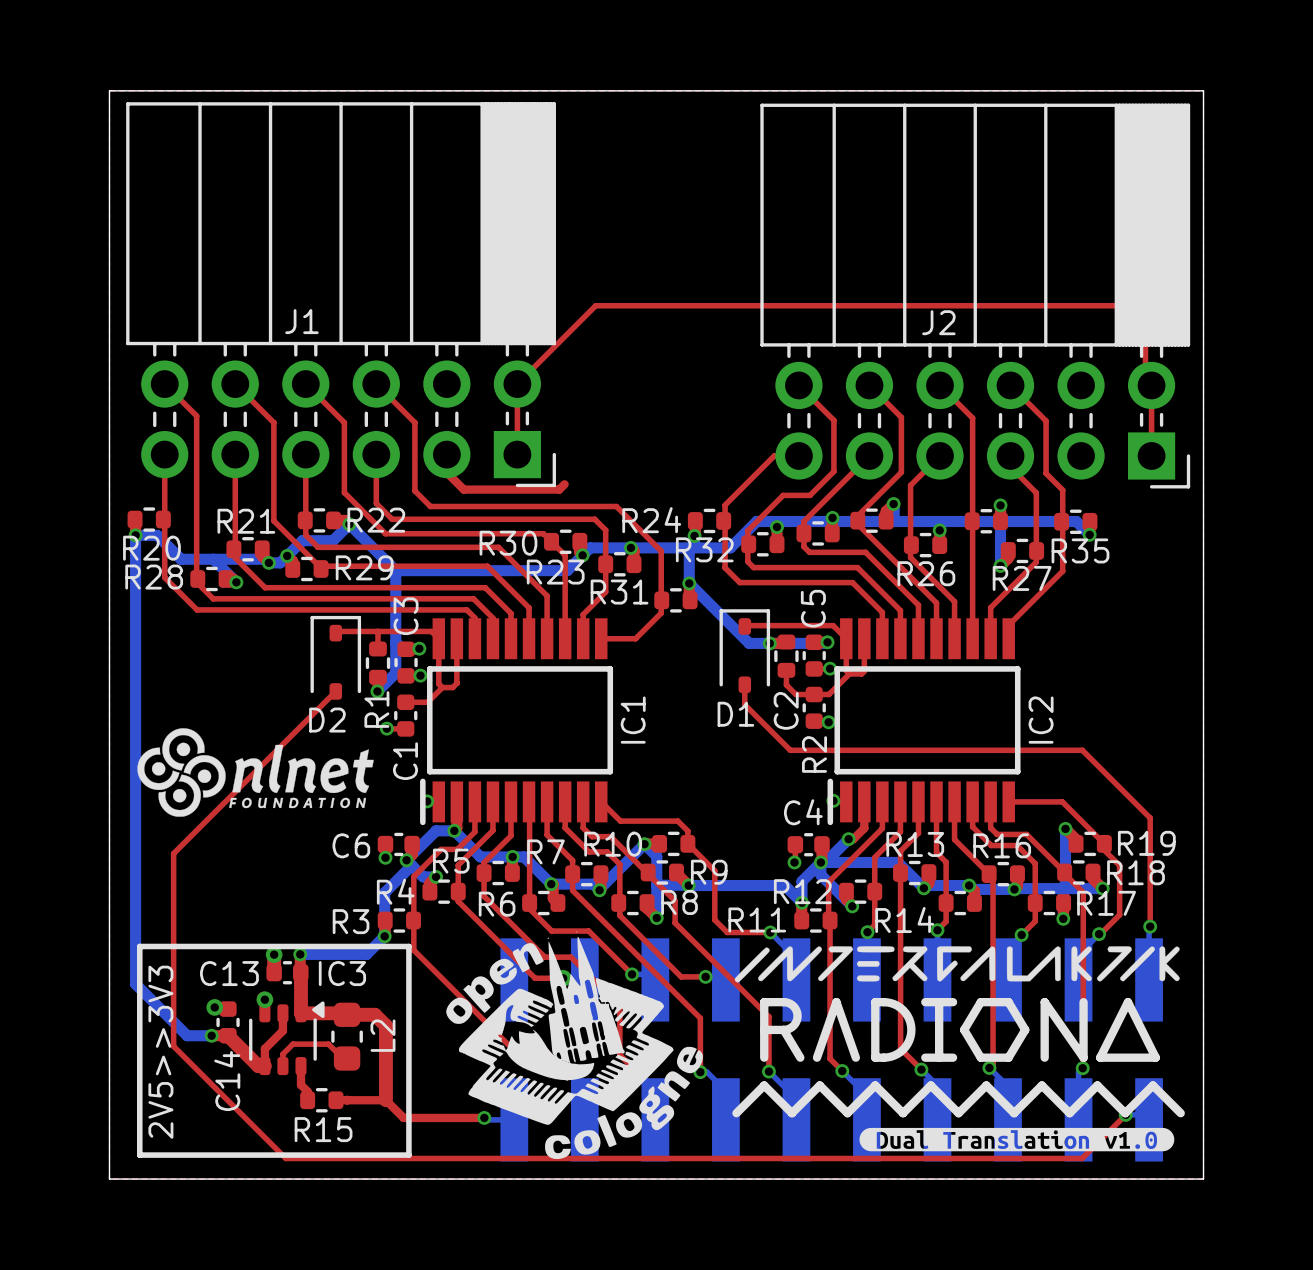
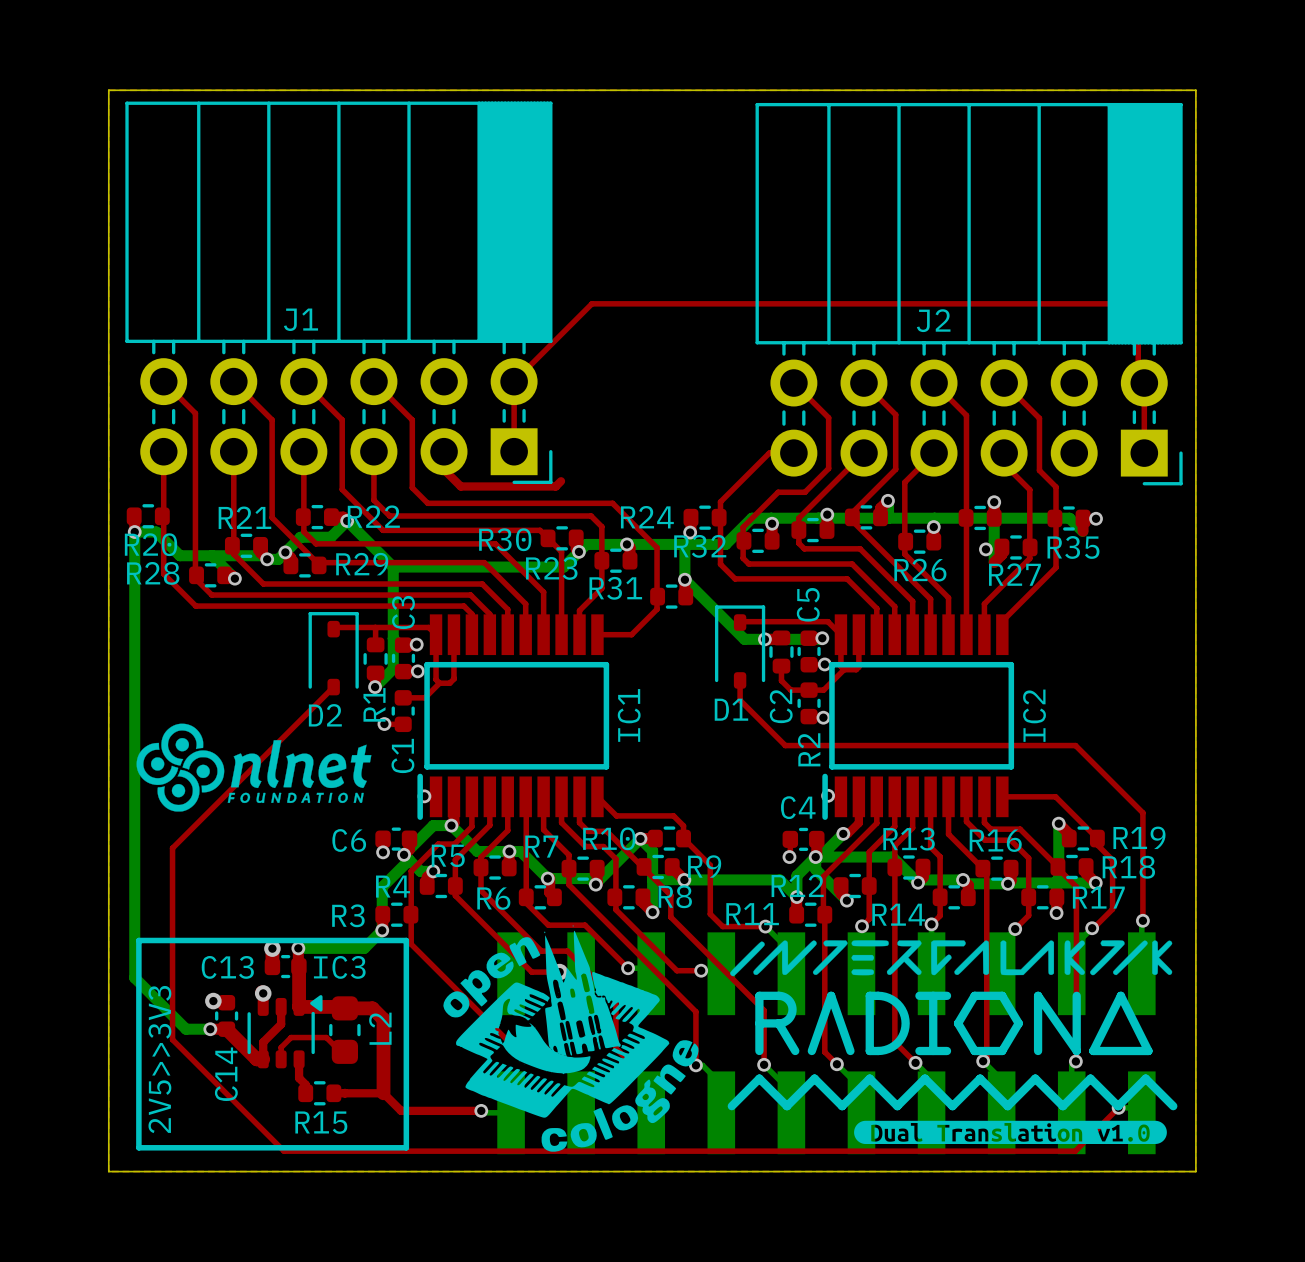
via position: (1089, 534) -> (1096, 518)
via position: (1000, 565) -> (985, 549)

